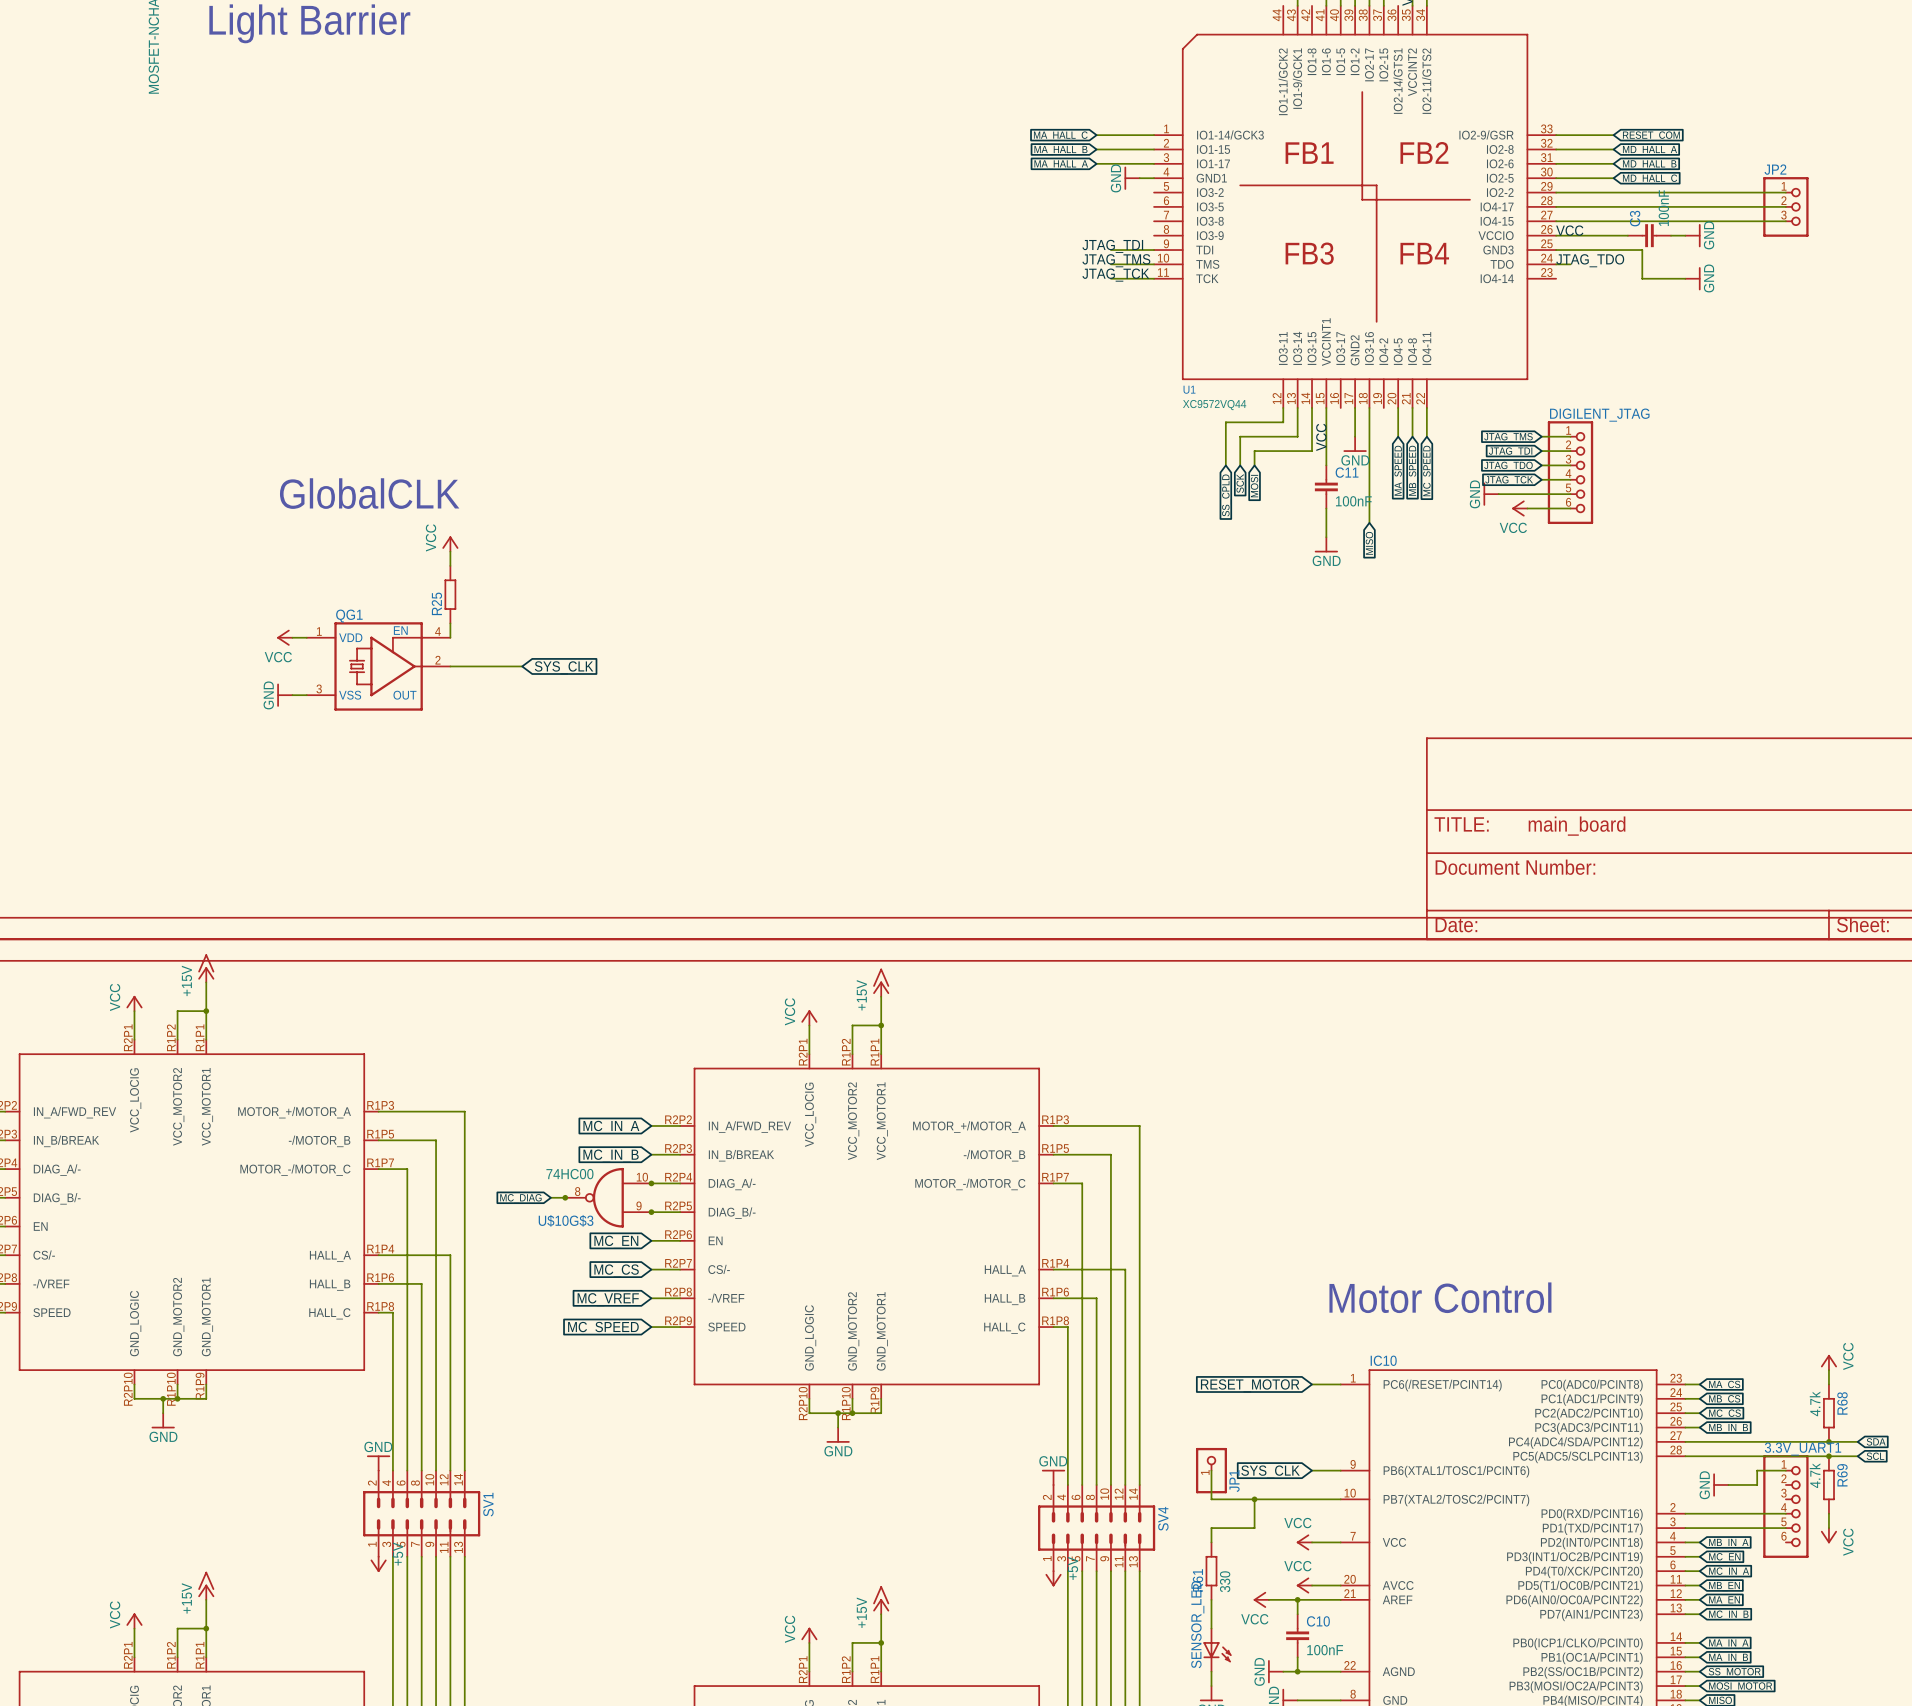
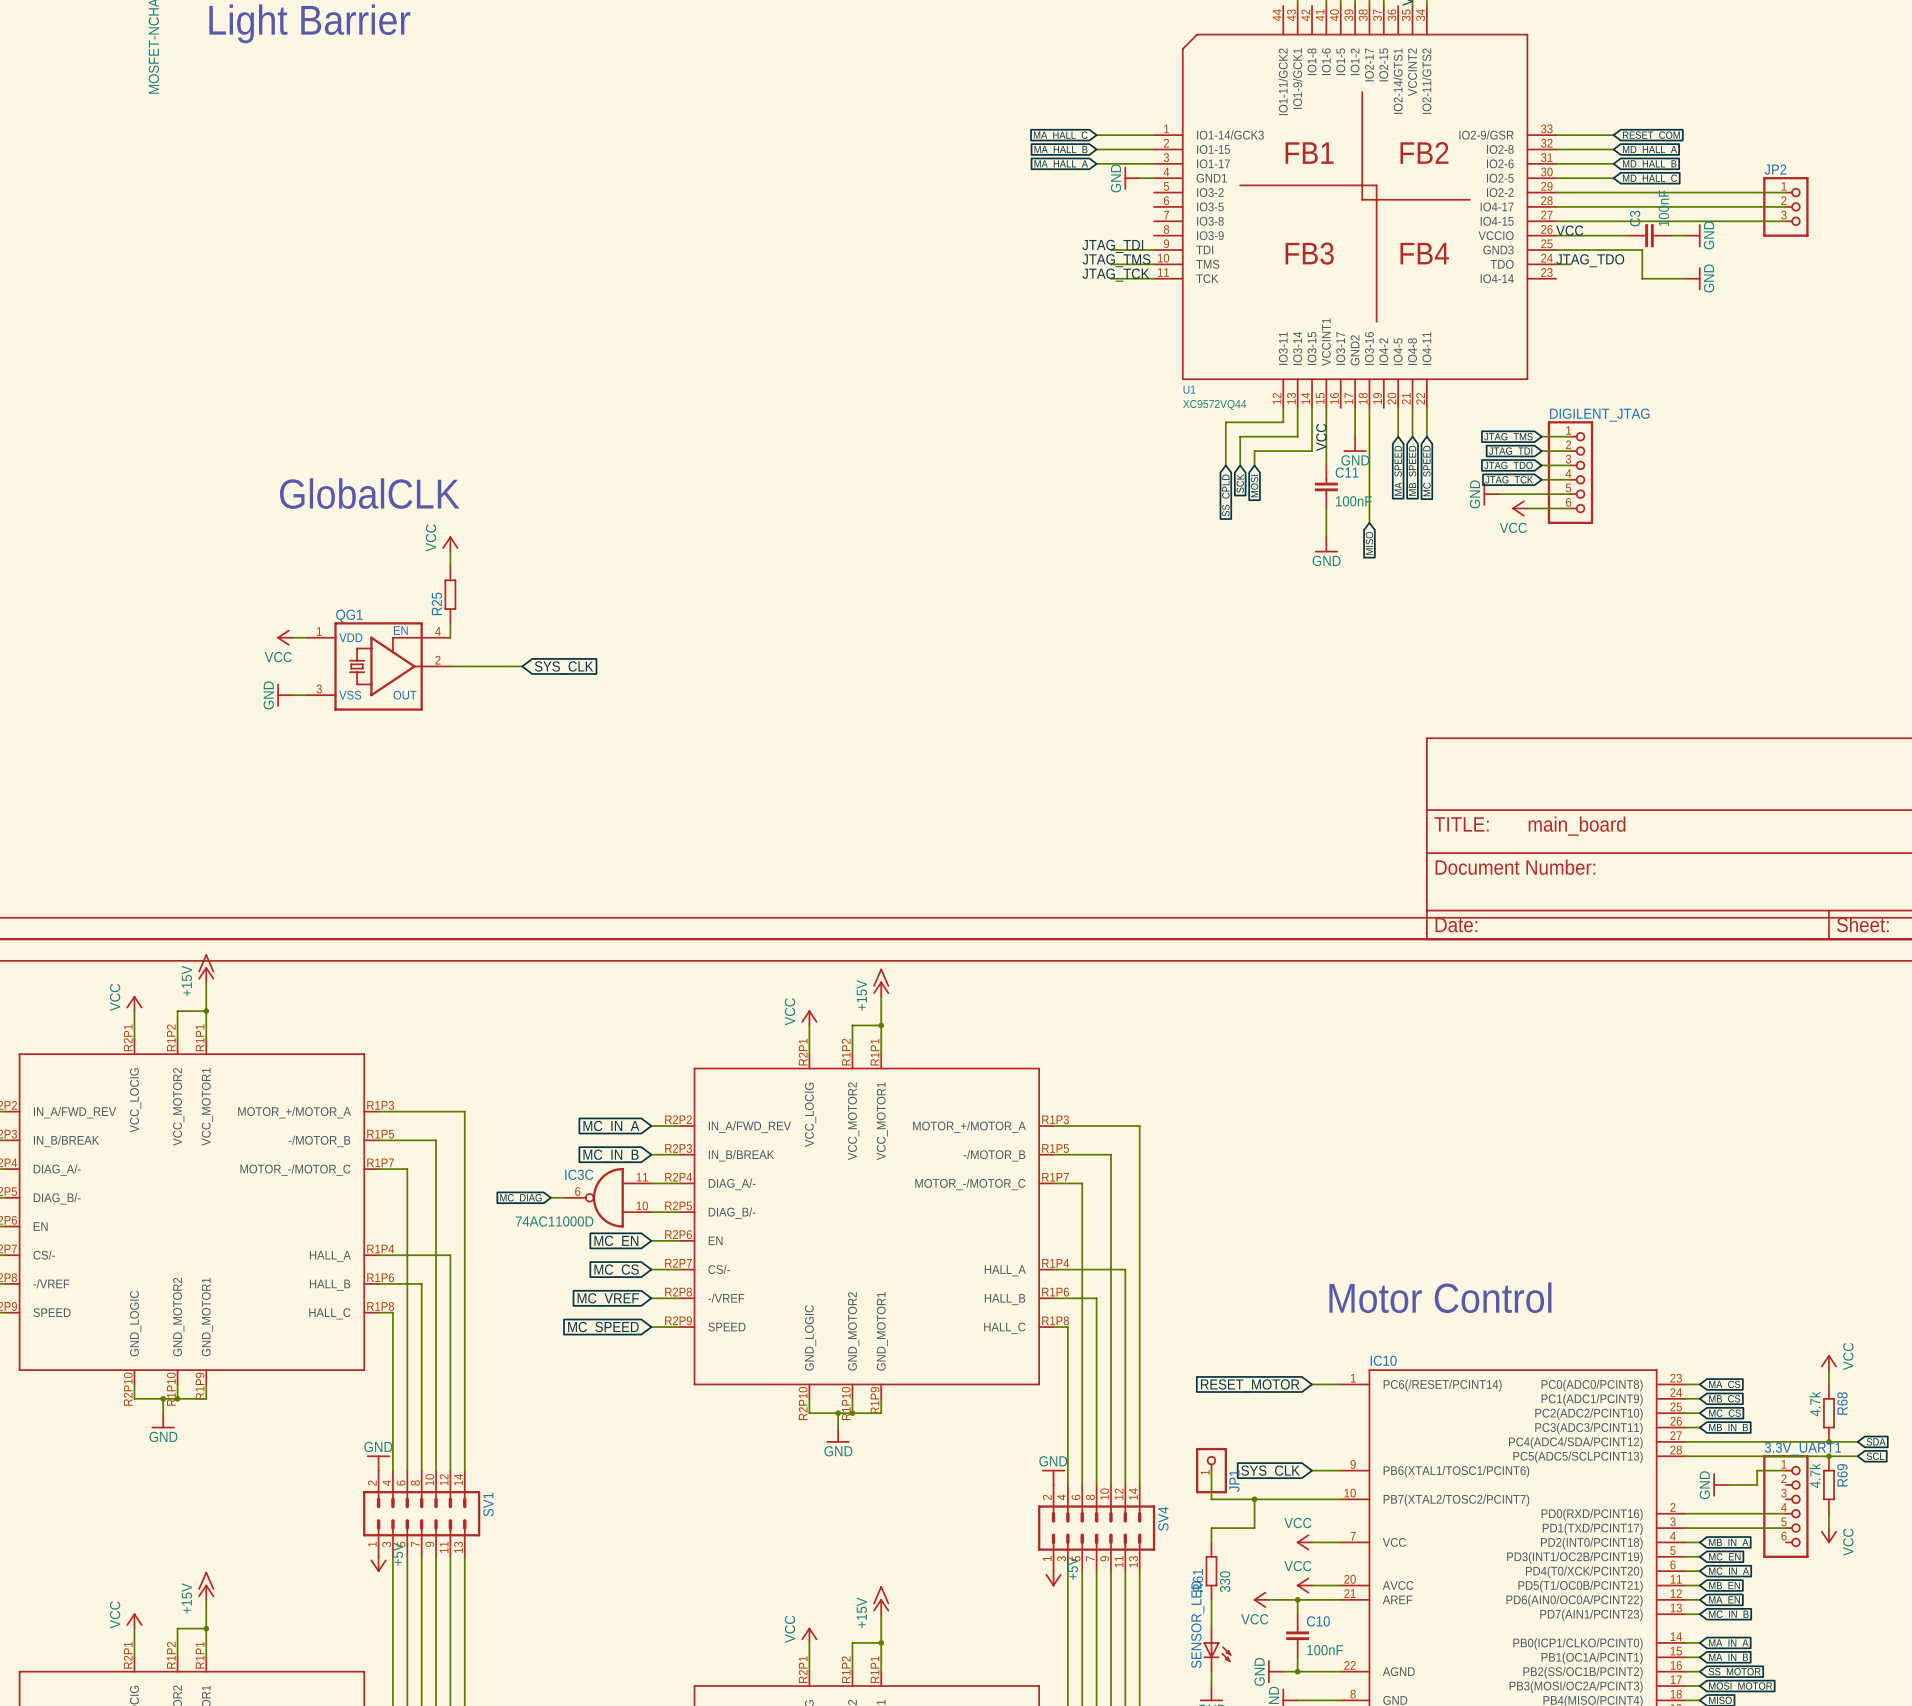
U$10G$3 value: 74HC00 (569, 1174) -> 74AC11000D (554, 1221)
U$10G$3 pin number: 10 (642, 1177) -> 11 (642, 1177)
junction: (651, 1183) -> none
U$10G$3 pin number: 8 (577, 1191) -> 6 (577, 1191)
junction: (565, 1197) -> none
U$10G$3 pin number: 9 (639, 1205) -> 10 (642, 1205)
junction: (651, 1212) -> none
U$10G$3 name: U$10G$3 (566, 1220) -> IC3C (579, 1174)

